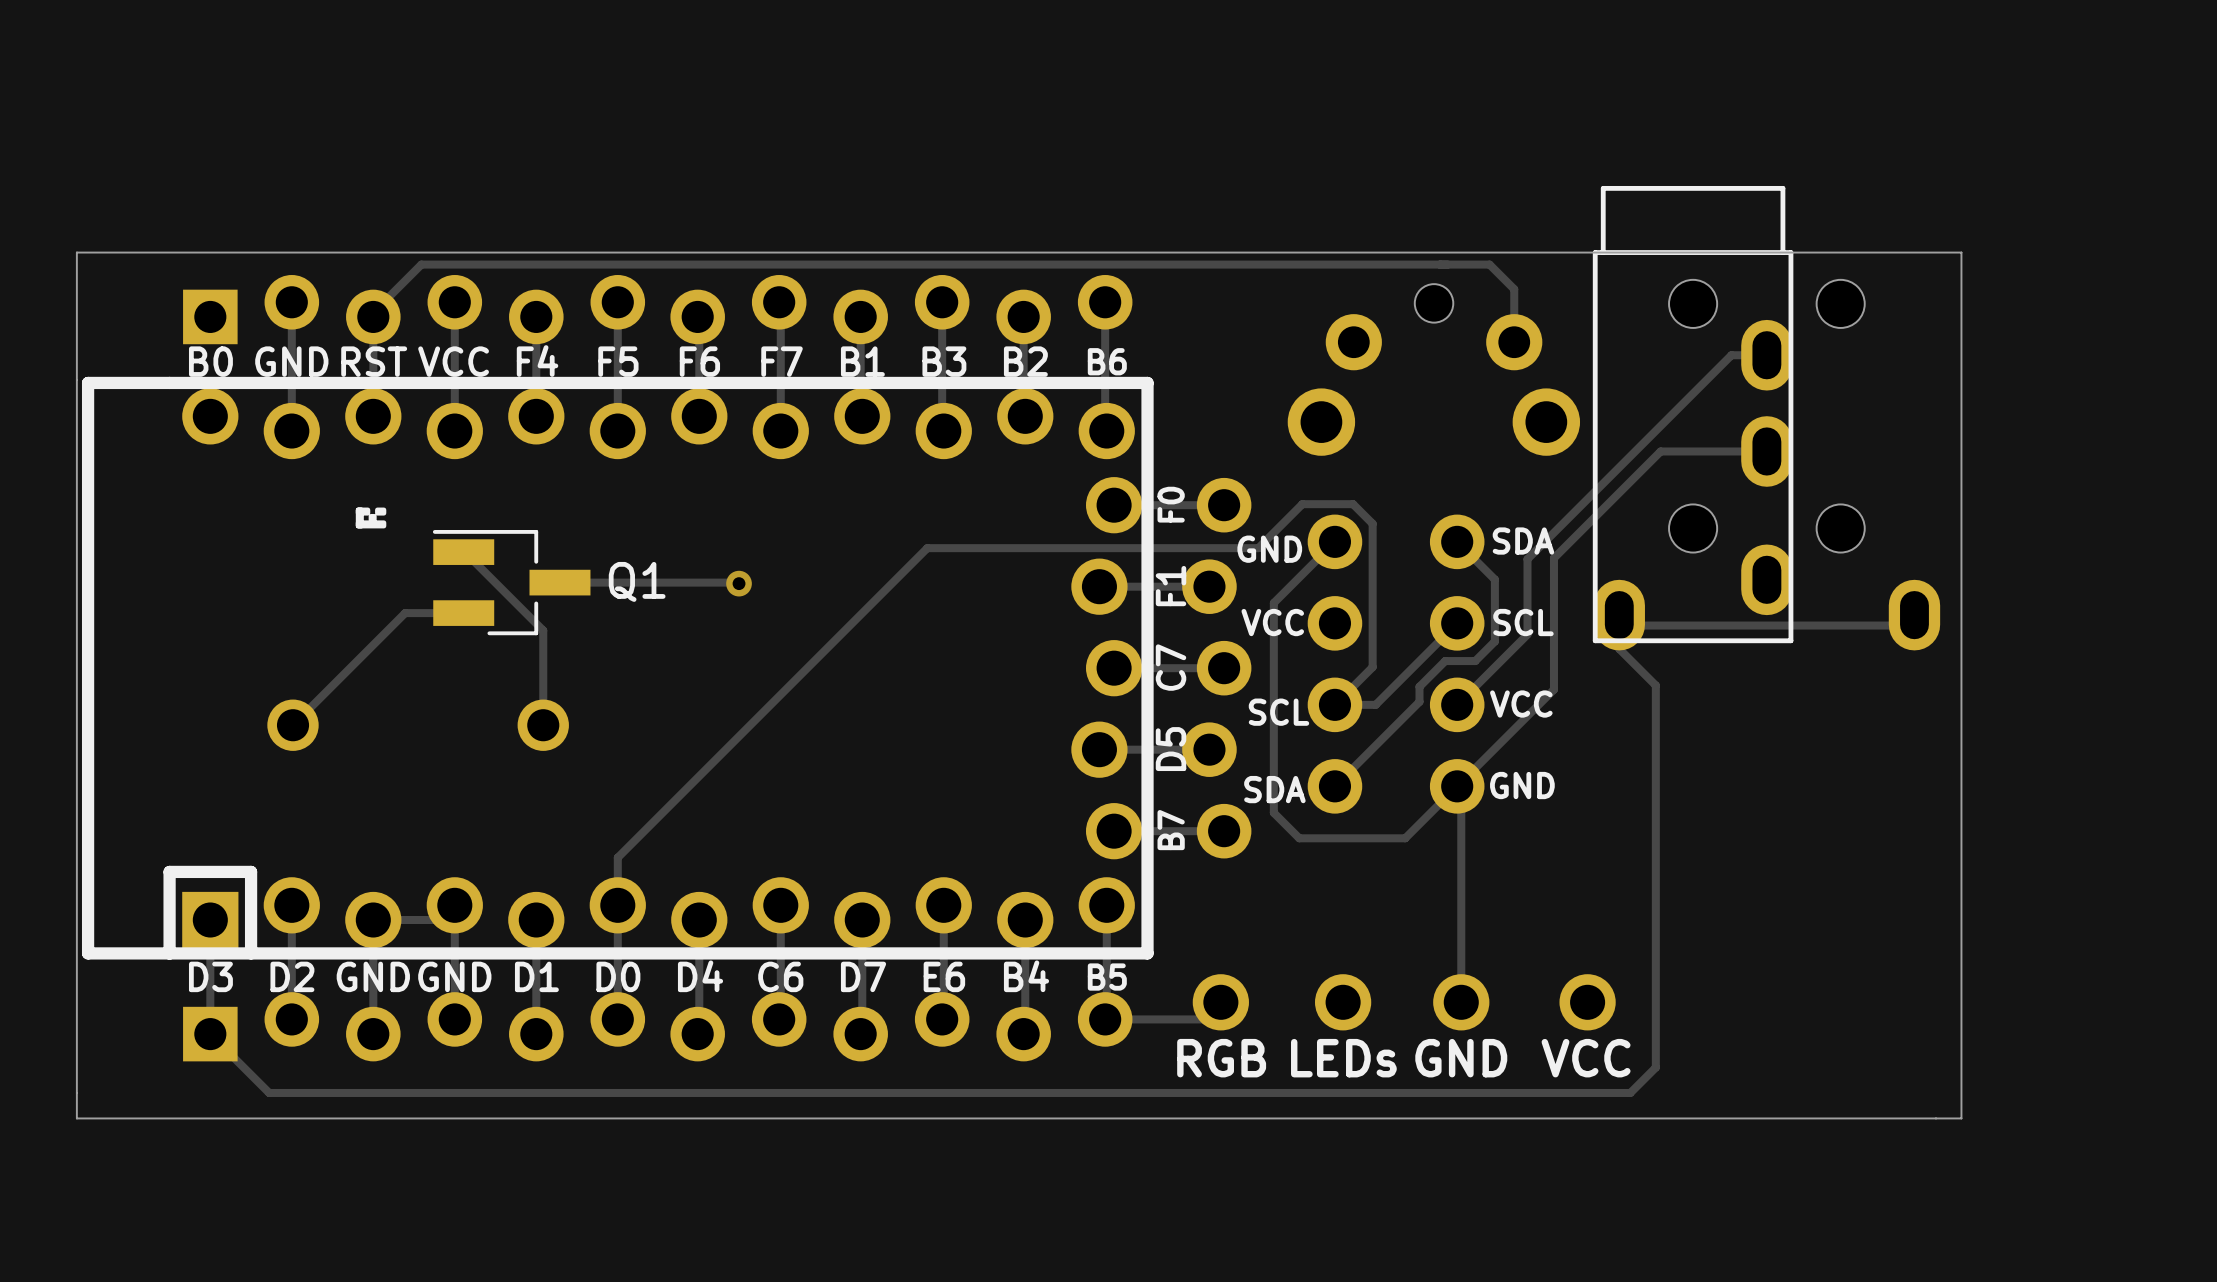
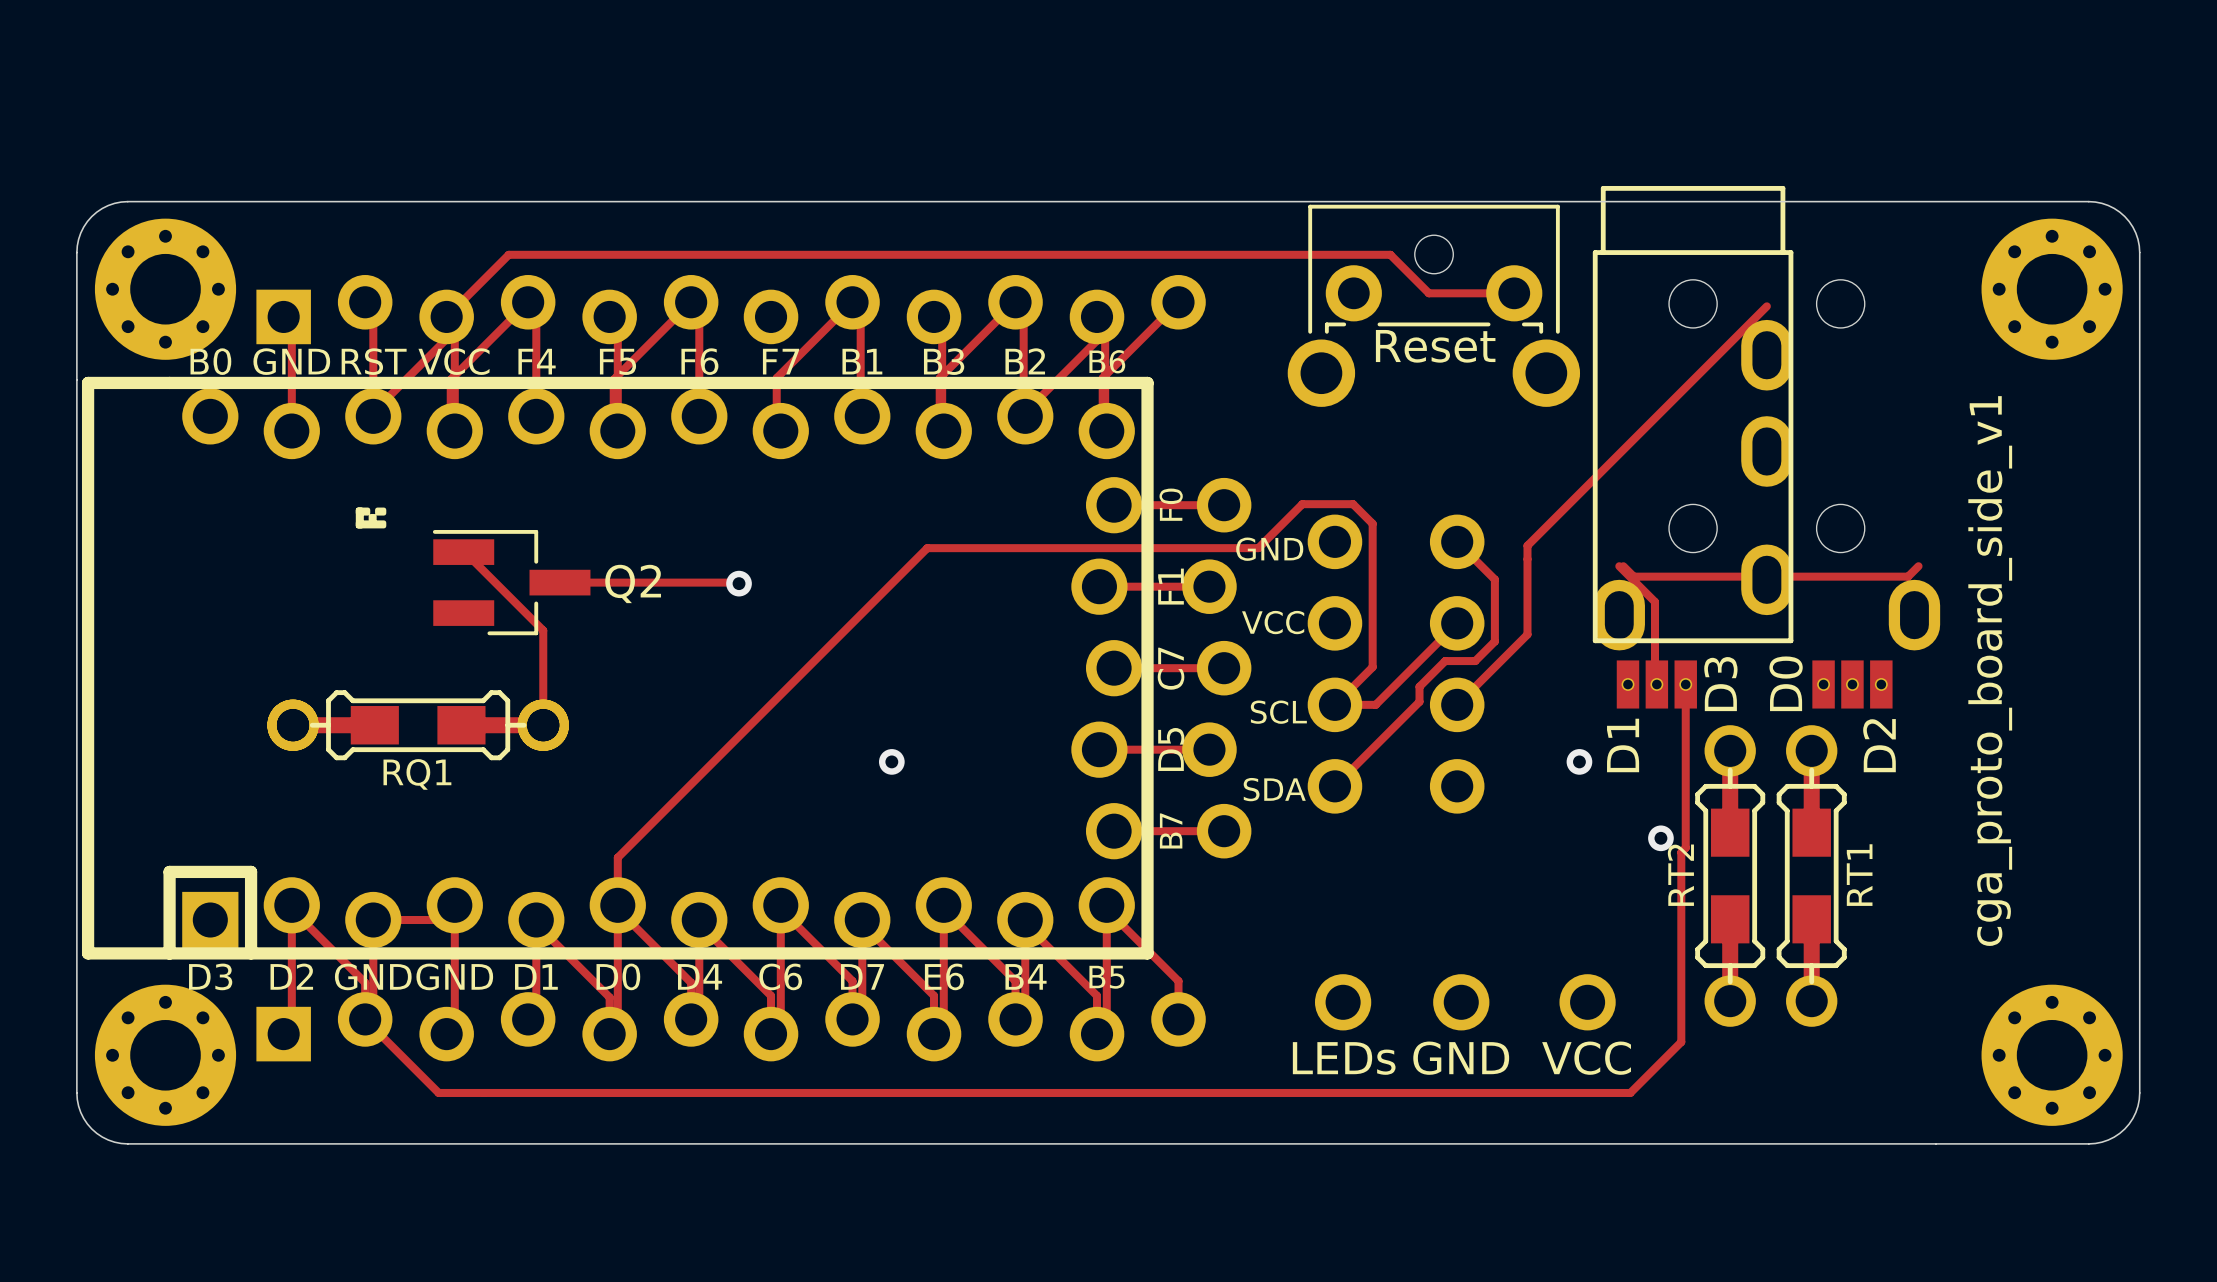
board edge: (76, 252) (1961, 252) (1961, 1118) (76, 1118) (76, 1092) -> (76, 252) (80, 233) (91, 216) (108, 205) (127, 201) (2088, 201) (2108, 205) (2124, 216) (2135, 233) (2139, 252) (2139, 1092) (2137, 1106) (2132, 1118) (2119, 1133) (2108, 1140) (2088, 1143) (127, 1143) (108, 1140) (91, 1128) (80, 1112) (76, 1092)
part: none -> (165, 289)
part: none -> (2052, 289)
track: none -> (1514, 293) (1428, 293) (1390, 254) (508, 254) (446, 316) (446, 338) (369, 416)
track: none -> (528, 302) (450, 379) (450, 431)
track: none -> (691, 302) (613, 379) (613, 431)
track: none -> (852, 302) (776, 378) (776, 431)
track: none -> (1015, 302) (939, 378) (939, 431)
track: none -> (1178, 302) (1102, 378) (1102, 431)
track: (780, 303) (780, 431) -> none
part: none -> (1433, 305)
part position: (657, 309) -> (731, 309)
track: (373, 312) (421, 264) (1489, 264) (1514, 289) (1514, 342) -> none
track: none -> (1097, 316) (1097, 340) (1021, 416)
track: (1766, 355) (1731, 355) (1527, 559) -> (1766, 306) (1527, 545) (1527, 559)
part: (1433, 369) -> none
track: (1766, 451) (1660, 451) (1553, 558) (1553, 689) (1405, 838) (1299, 838) (1273, 812) (1273, 602) (1334, 541) -> none
text: SDA (1523, 541) -> none
track: none -> (1619, 566) (1655, 601) (1655, 684)
track: none -> (1623, 566) (1633, 576) (1908, 576) (1918, 566)
Q1 name: Q1 (637, 581) -> Q2 (633, 583)
track: (463, 613) (405, 613) (293, 725) -> none
track: (1914, 615) (1904, 625) (1629, 625) (1619, 615) (1619, 648) (1655, 685) (1655, 1067) -> (1685, 684) (1685, 847) (1681, 852) (1681, 1042) (1655, 1067)
text: SCL (1523, 622) -> none
text: none -> cga_proto_board_side_v1 (1990, 671)
text: none -> D3 (1720, 684)
text: none -> D0 (1786, 683)
part: none -> (1656, 684)
part: none -> (1852, 684)
text: VCC (1521, 704) -> none
RQ1: none -> (418, 725)
text: none -> D1 (1623, 745)
text: none -> D2 (1879, 745)
via: none -> (891, 761)
via: none -> (1579, 761)
text: GND (1522, 785) -> none
track: (1461, 790) (1461, 1002) -> none
via: none -> (1660, 838)
RT2: none -> (1730, 875)
RT1: none -> (1811, 875)
track: none -> (613, 905) (691, 982) (691, 1019)
track: none -> (776, 905) (852, 981) (852, 1019)
track: none -> (939, 905) (1015, 981) (1015, 1019)
track: none -> (1102, 905) (1178, 981) (1178, 1019)
track: (210, 920) (210, 1034) (269, 1092) (438, 1092) -> (287, 905) (365, 982) (365, 1019) (438, 1092)
track: none -> (532, 920) (609, 997) (609, 1034)
track: none -> (695, 920) (771, 995) (771, 1034)
track: none -> (858, 920) (934, 995) (934, 1034)
track: none -> (1021, 920) (1097, 995) (1097, 1034)
track: (1220, 1002) (1203, 1019) (1105, 1019) -> none
part: RGB (1220, 1002) -> none
part position: (657, 1026) -> (731, 1026)
part: none -> (165, 1055)
part: none -> (2052, 1055)

